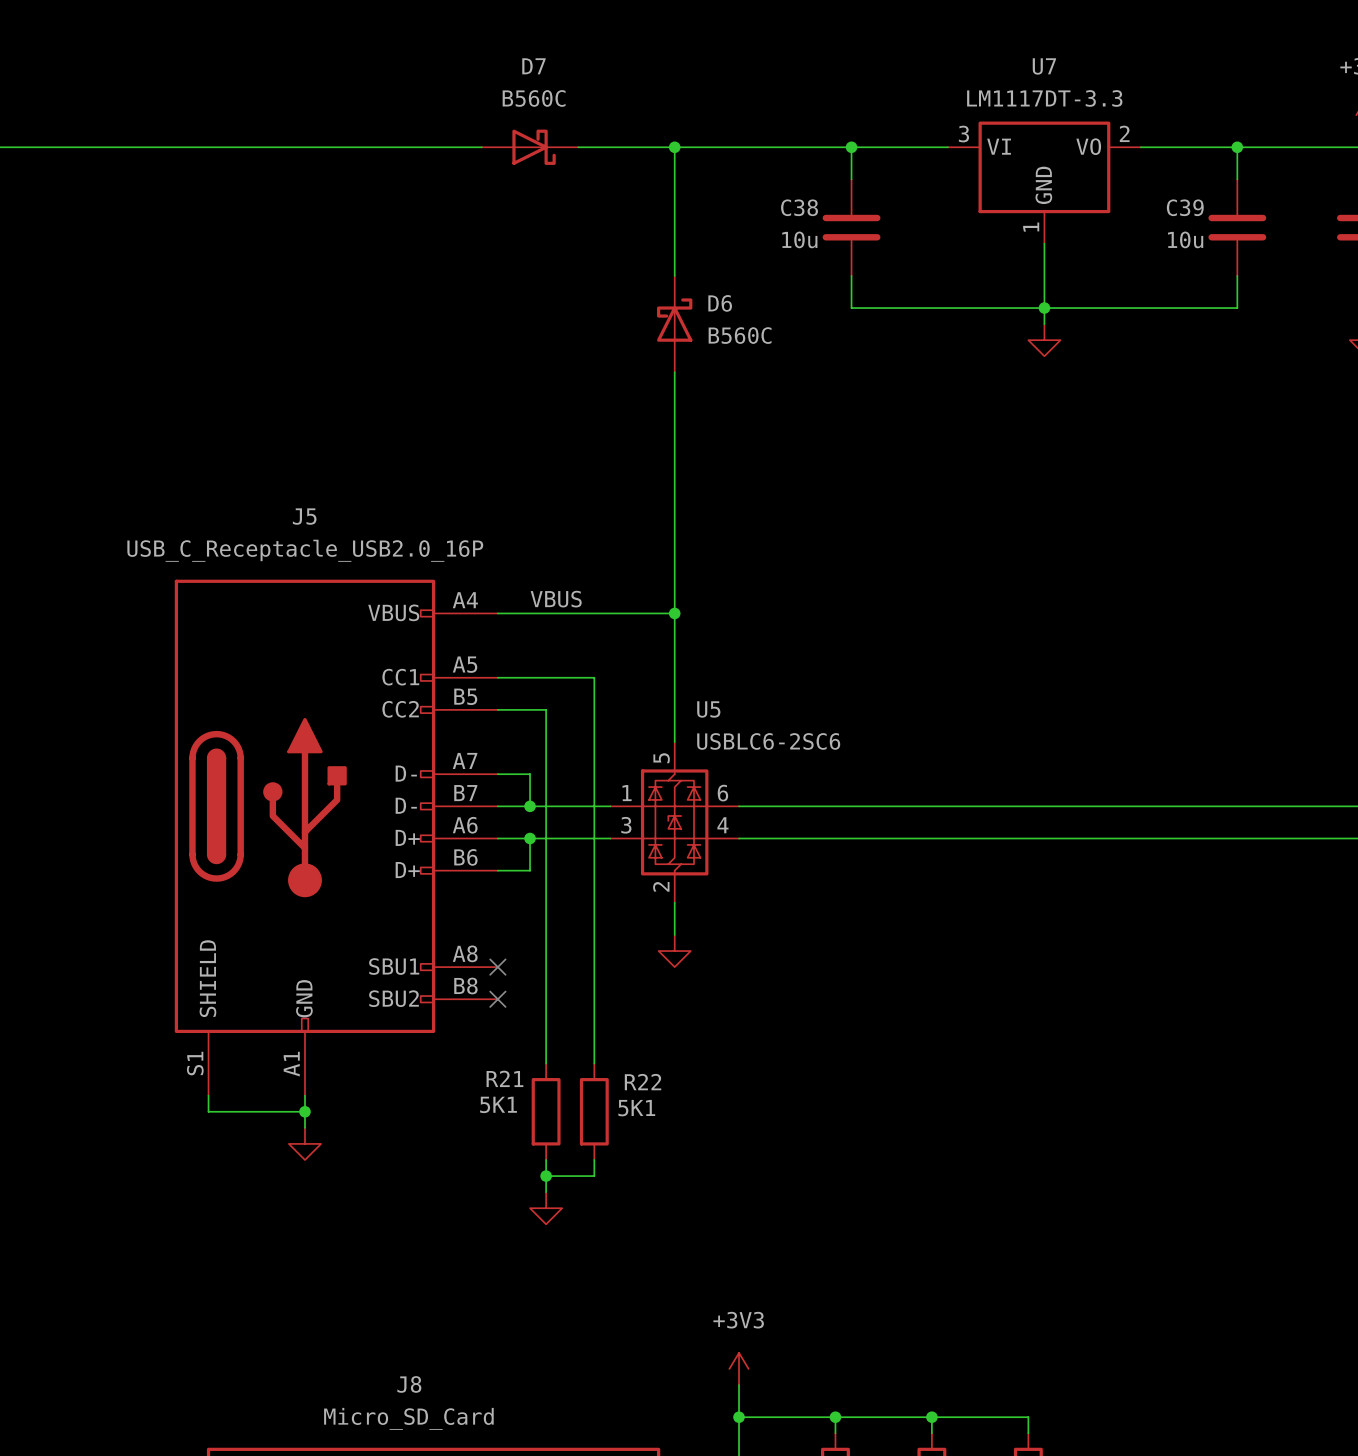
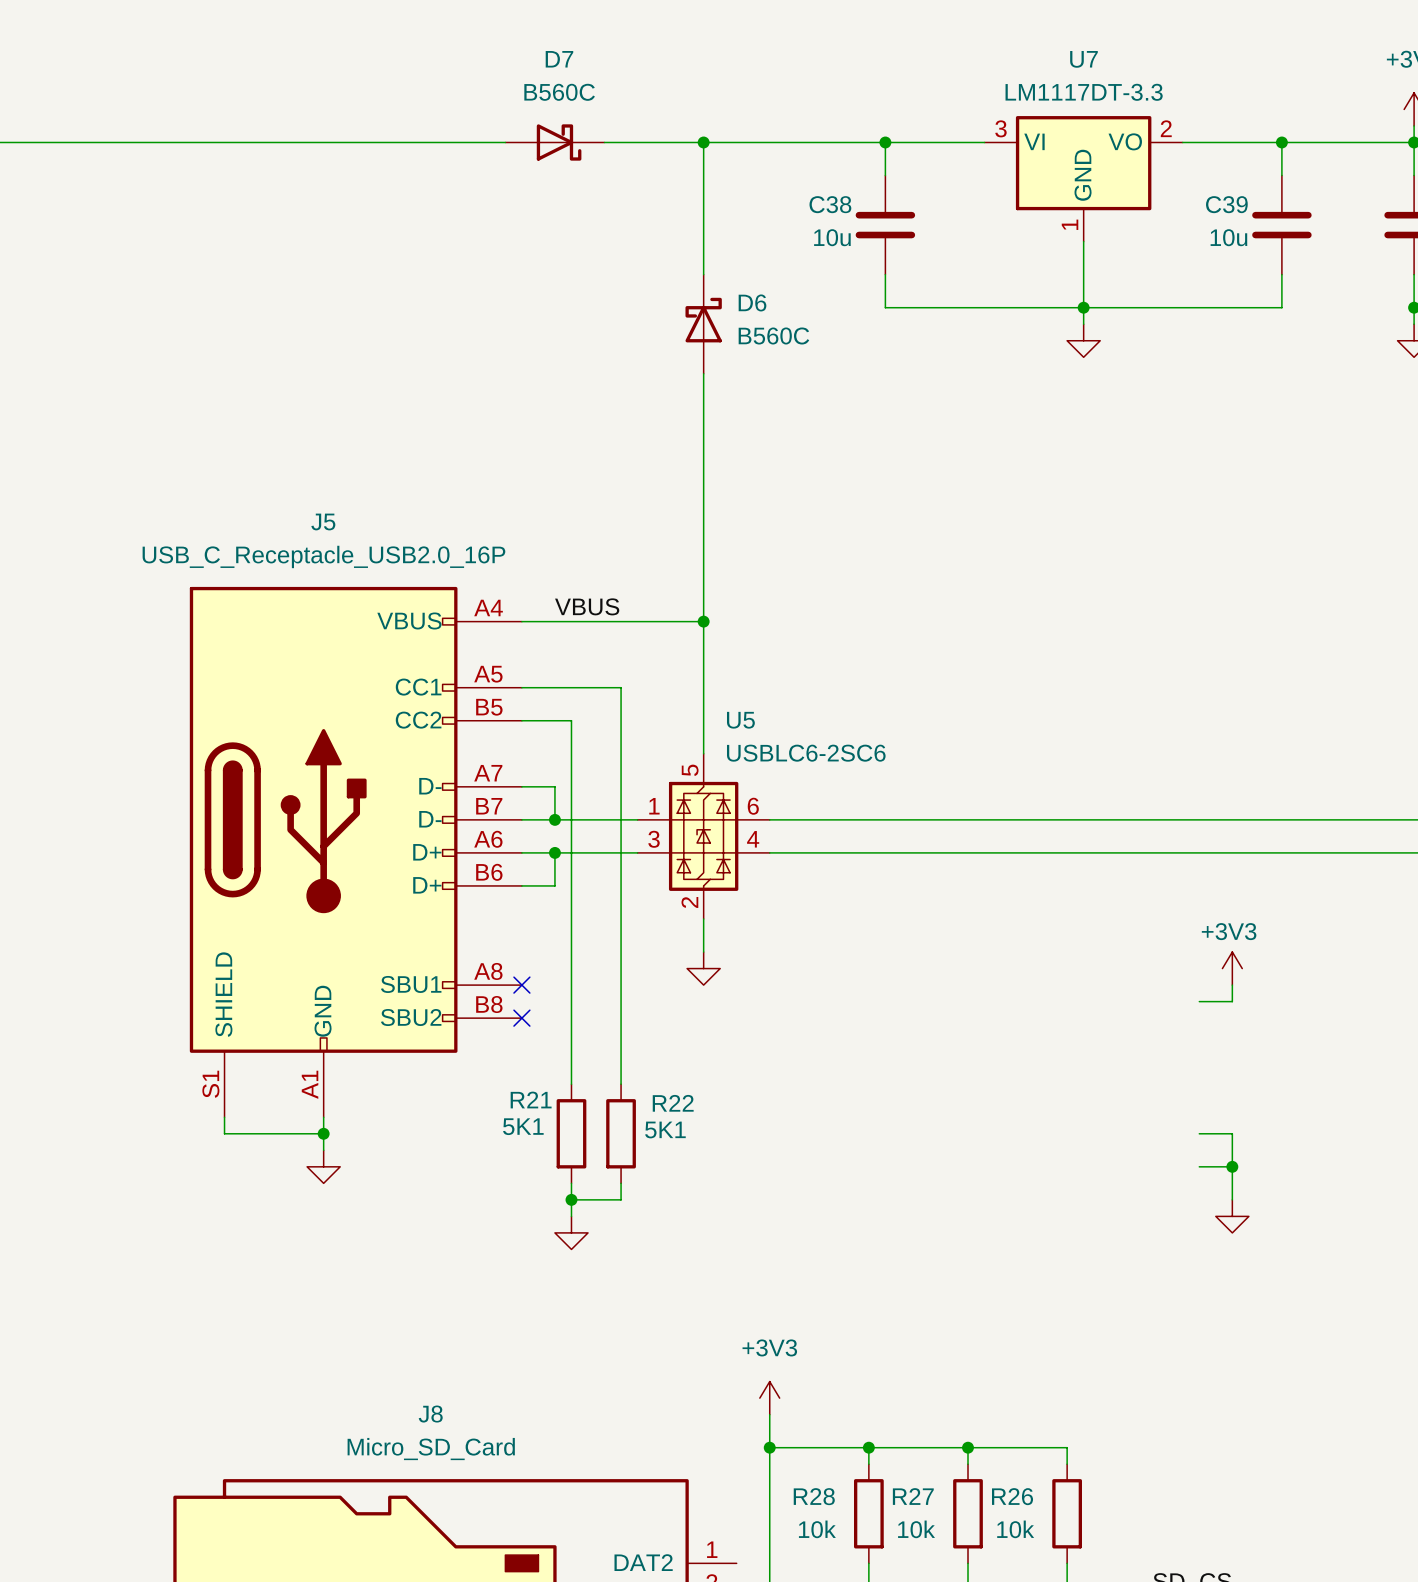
power symbol: none -> +3V3 (1232, 968)
wire: none -> (1232, 985) (1232, 1001) (1199, 1001)
wire: none -> (1199, 1133) (1232, 1133) (1232, 1199)
wire: none -> (1199, 1166) (1232, 1166)
junction: none -> (1232, 1166)
power symbol: none -> (1232, 1216)

